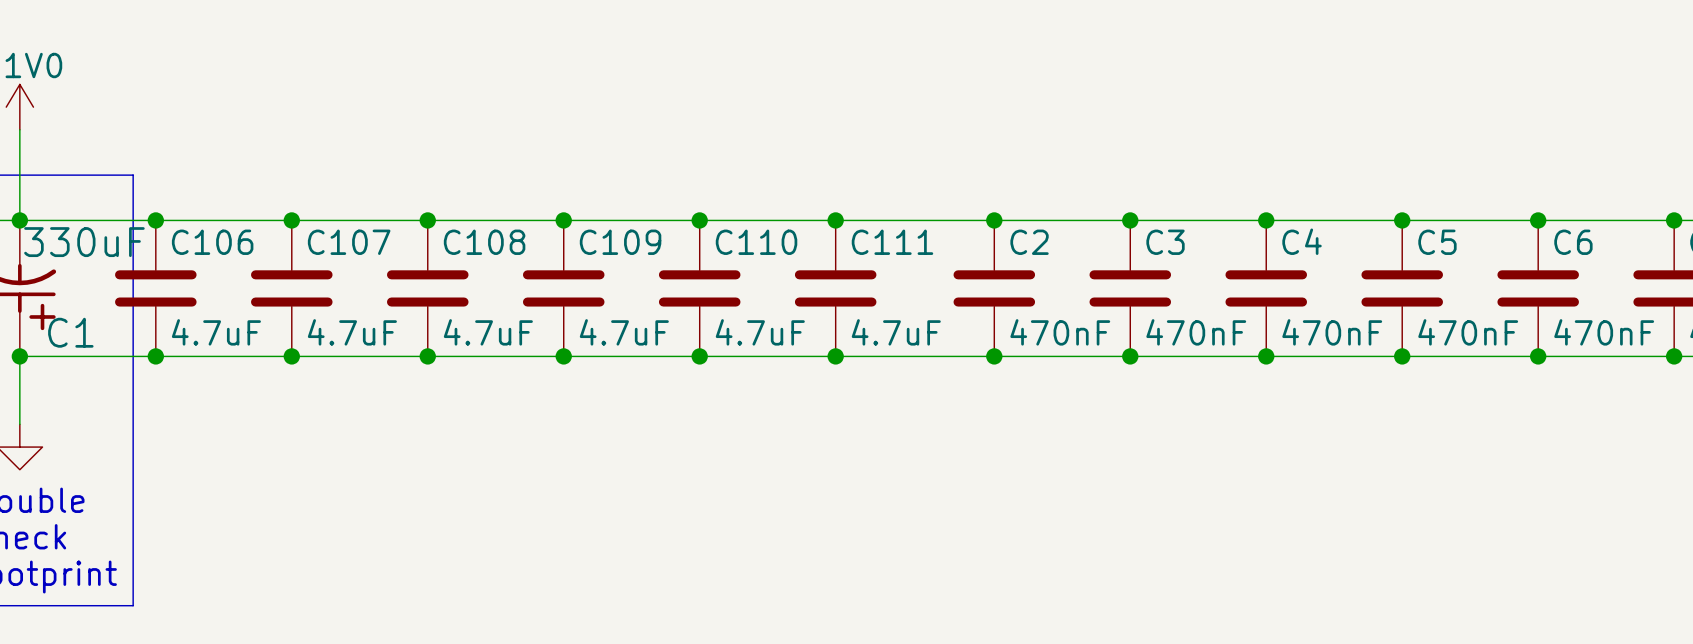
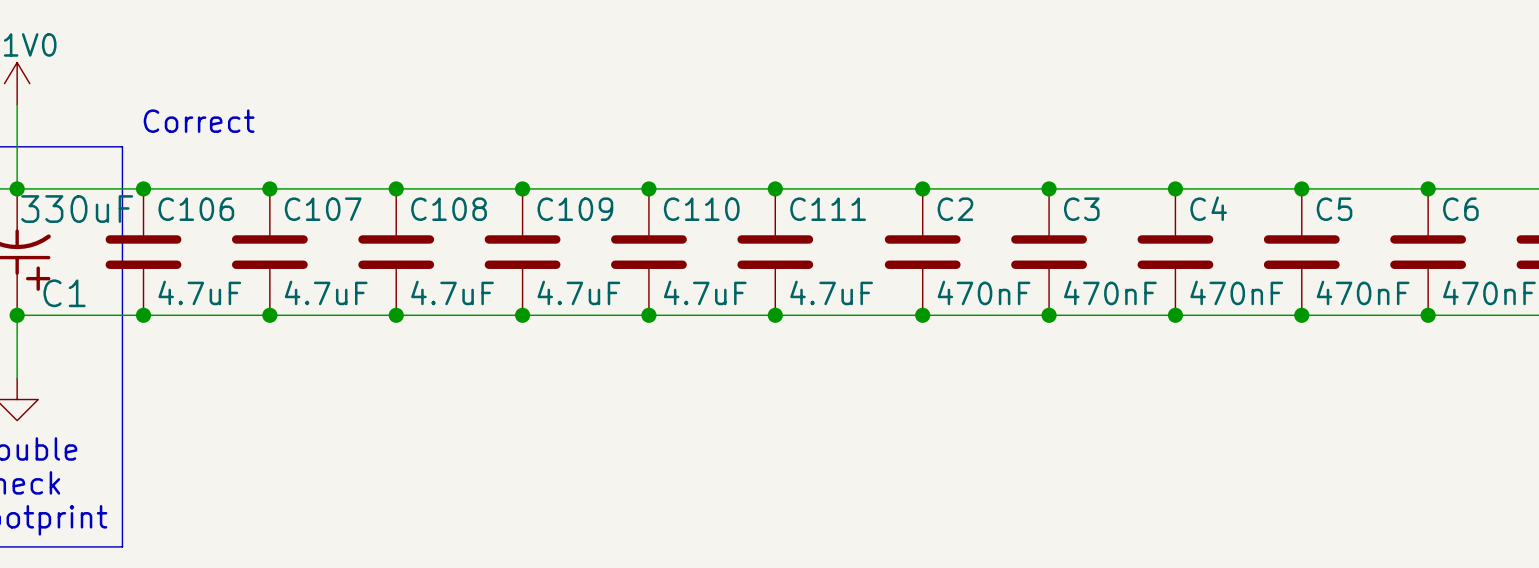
text: none -> Correct (199, 121)

